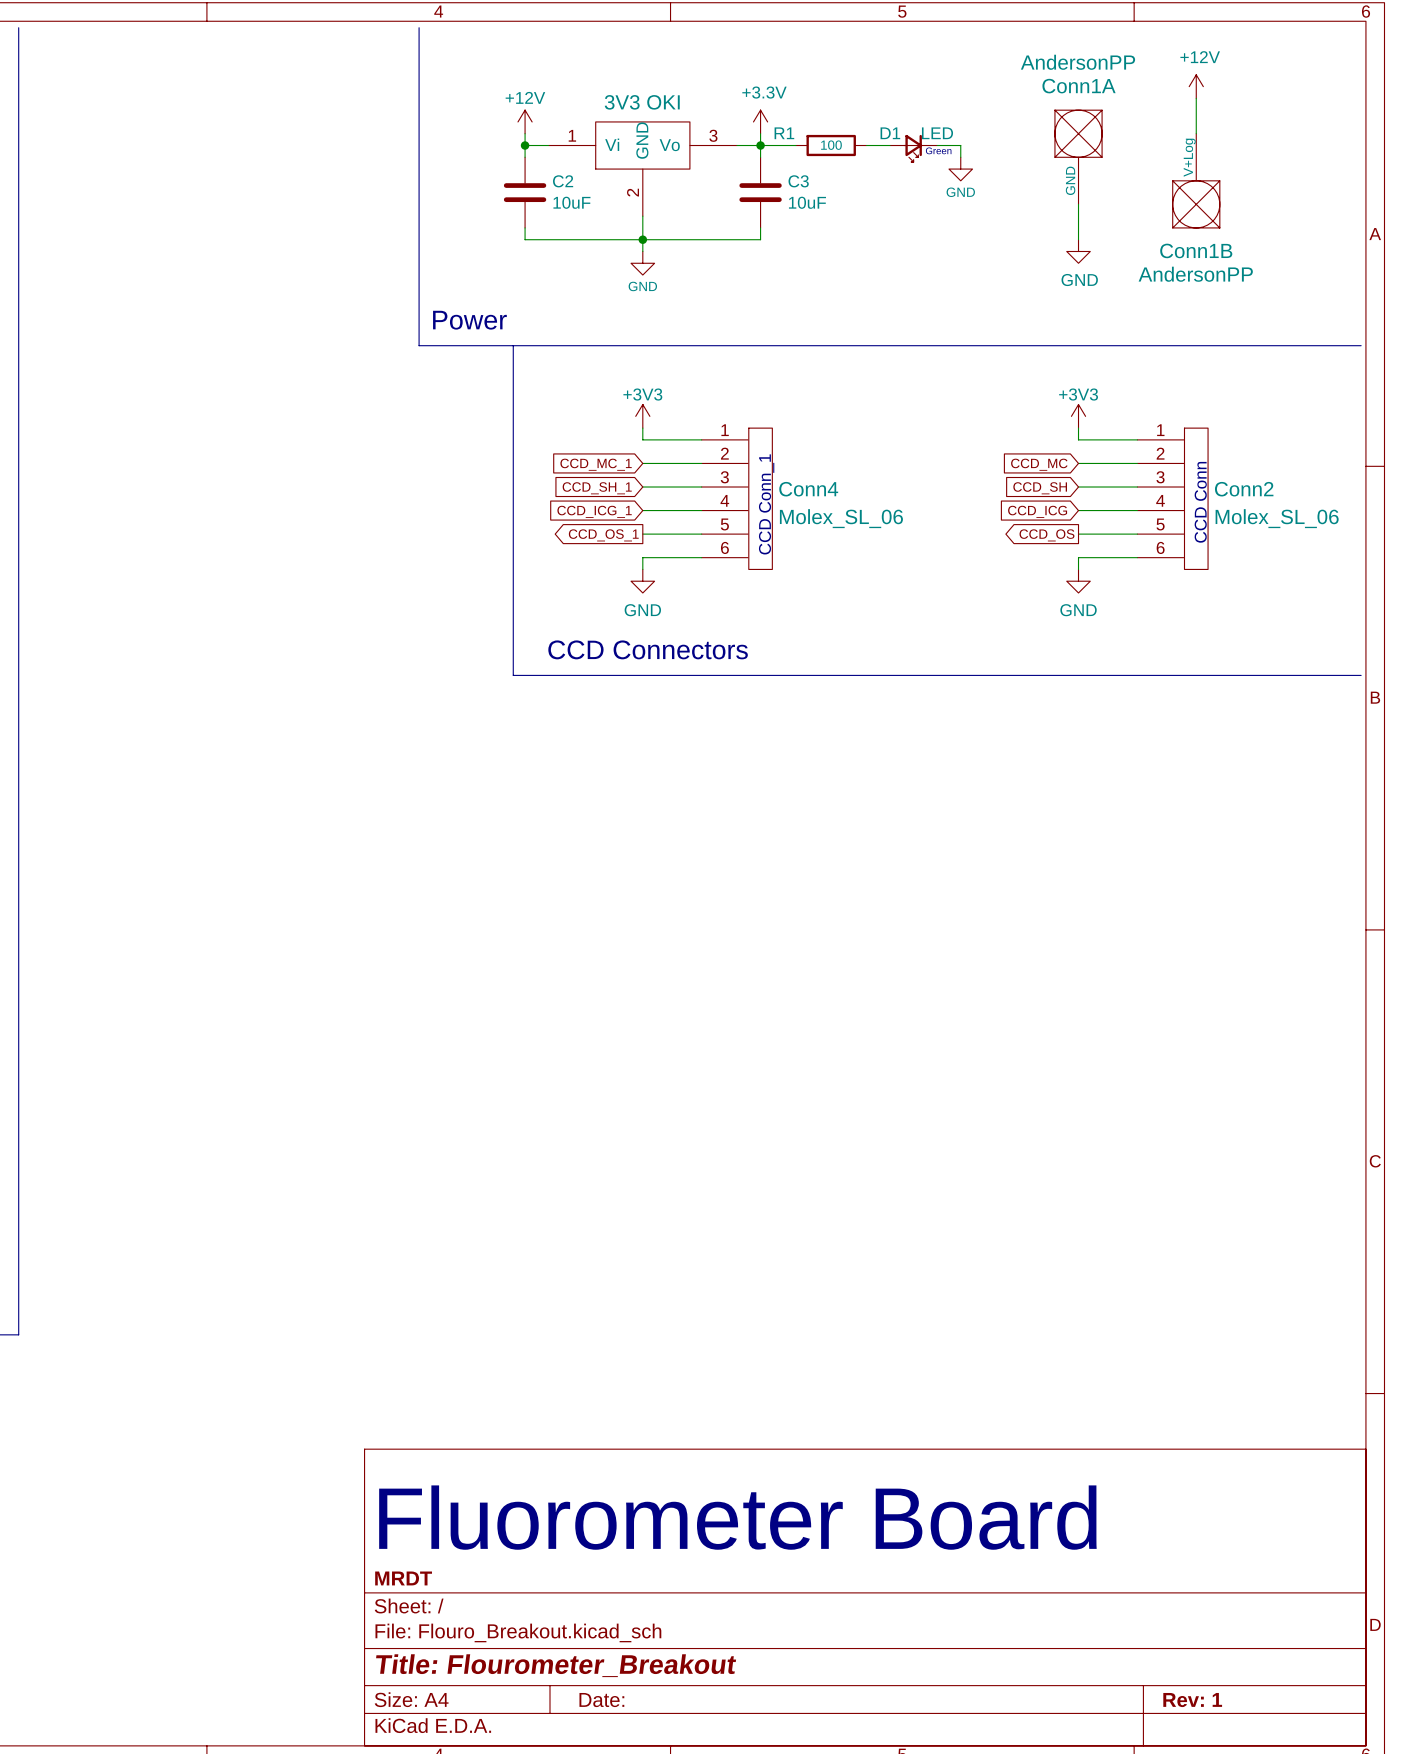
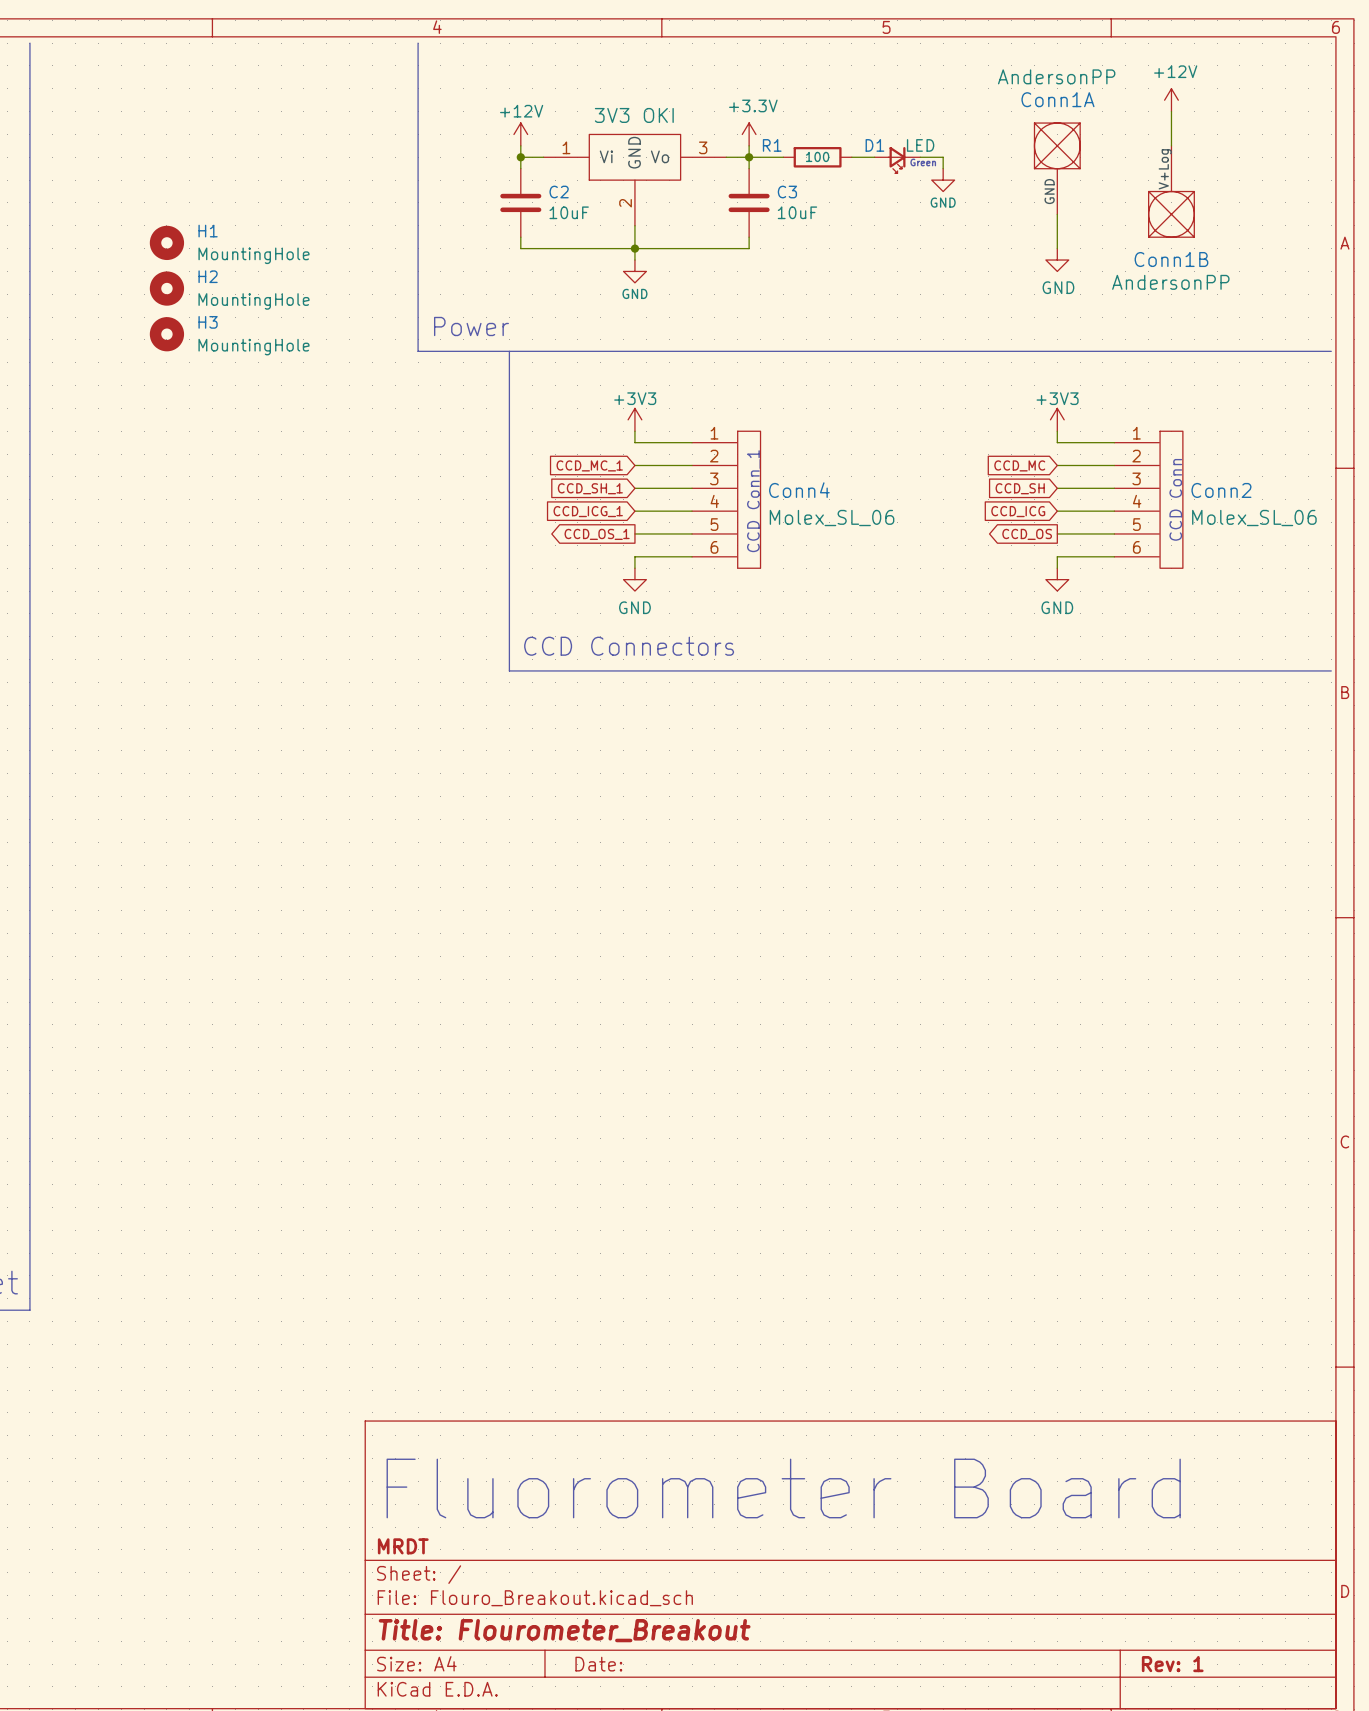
H1: none -> MountingHole (166, 242)
H2: none -> MountingHole (166, 288)
H3: none -> MountingHole (166, 334)

